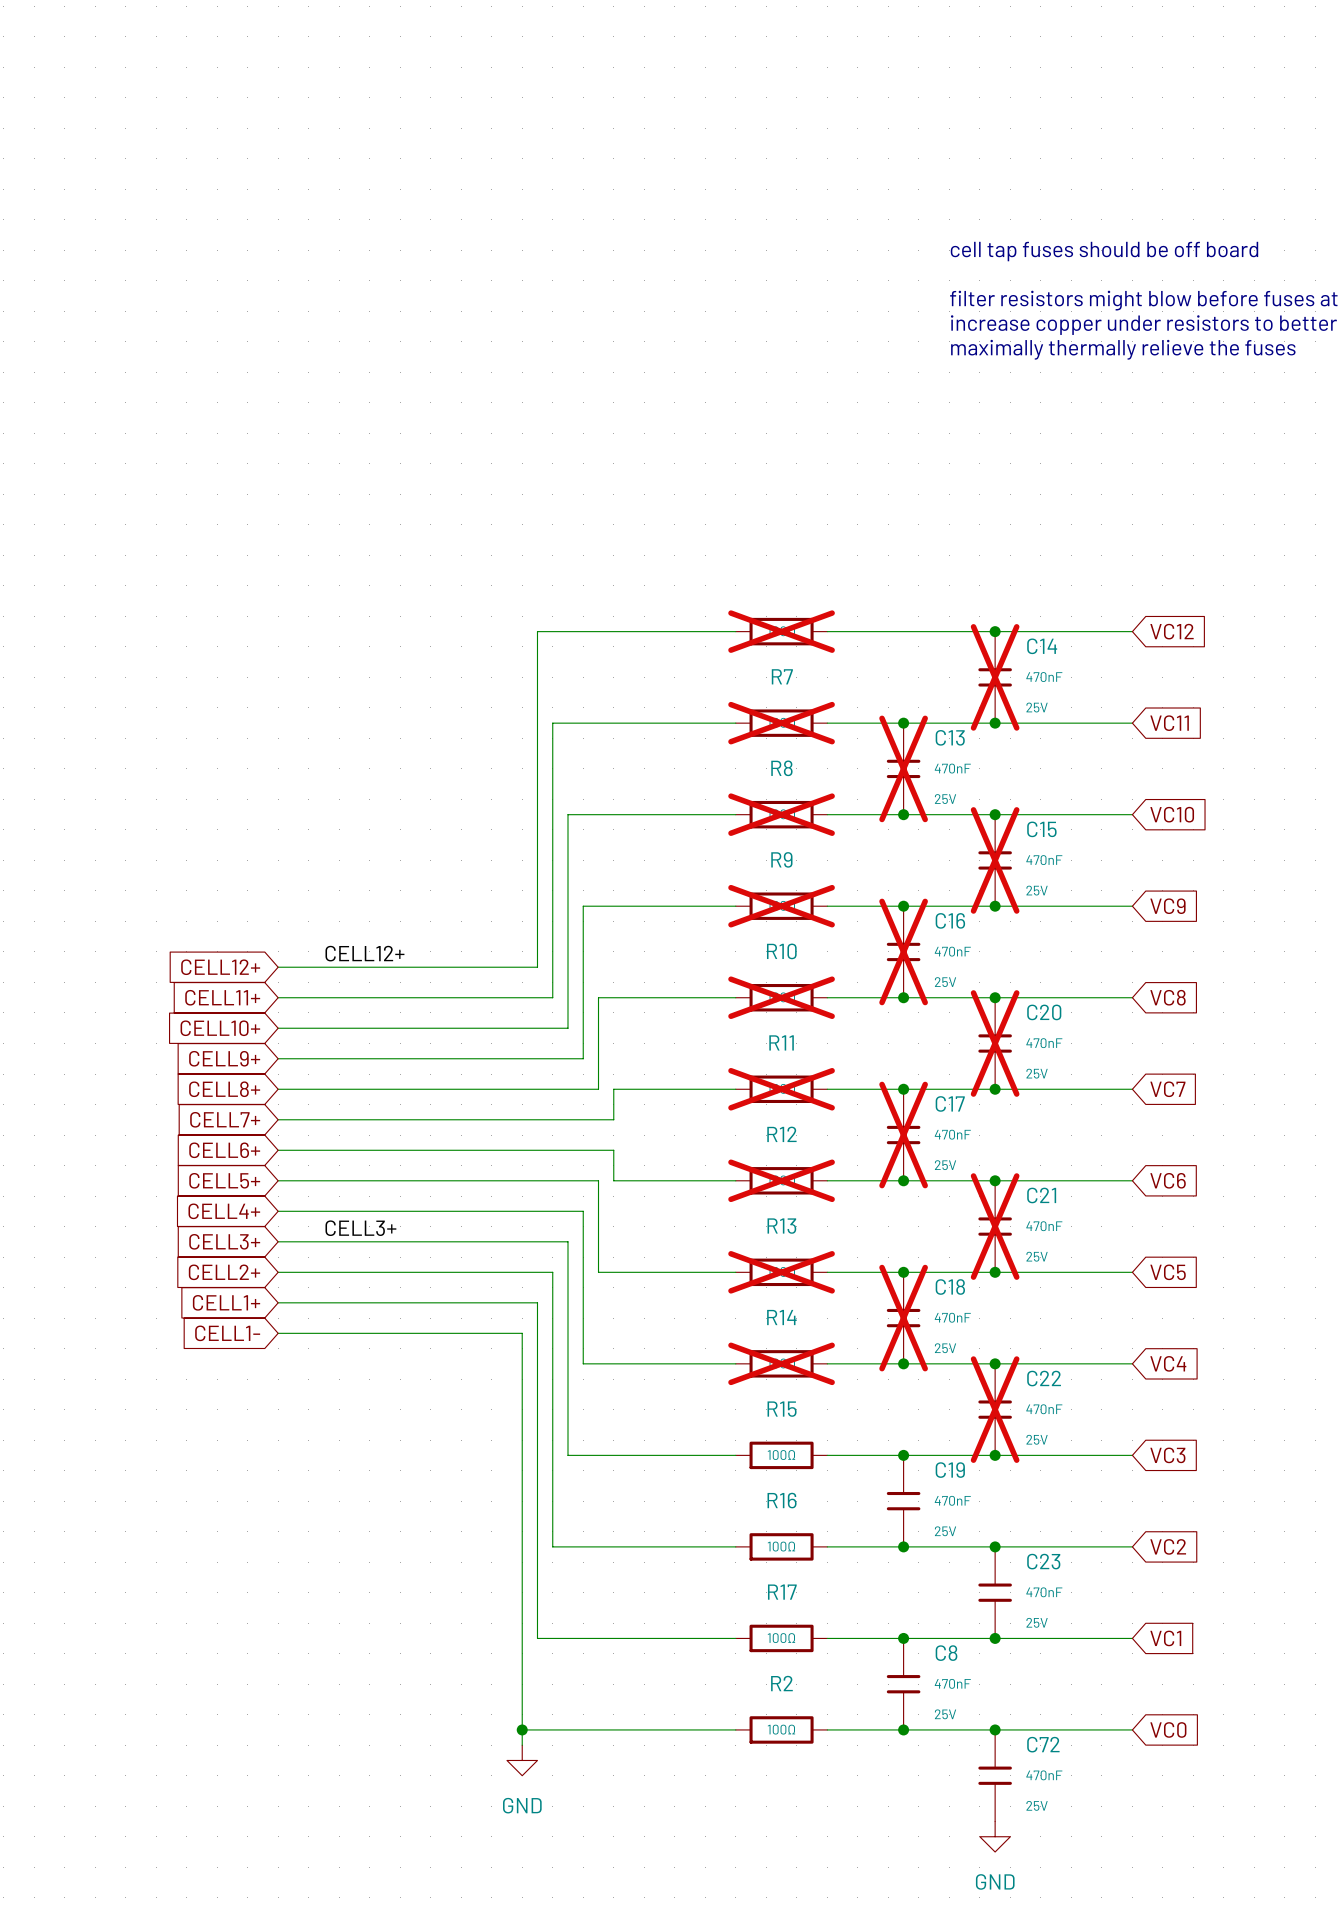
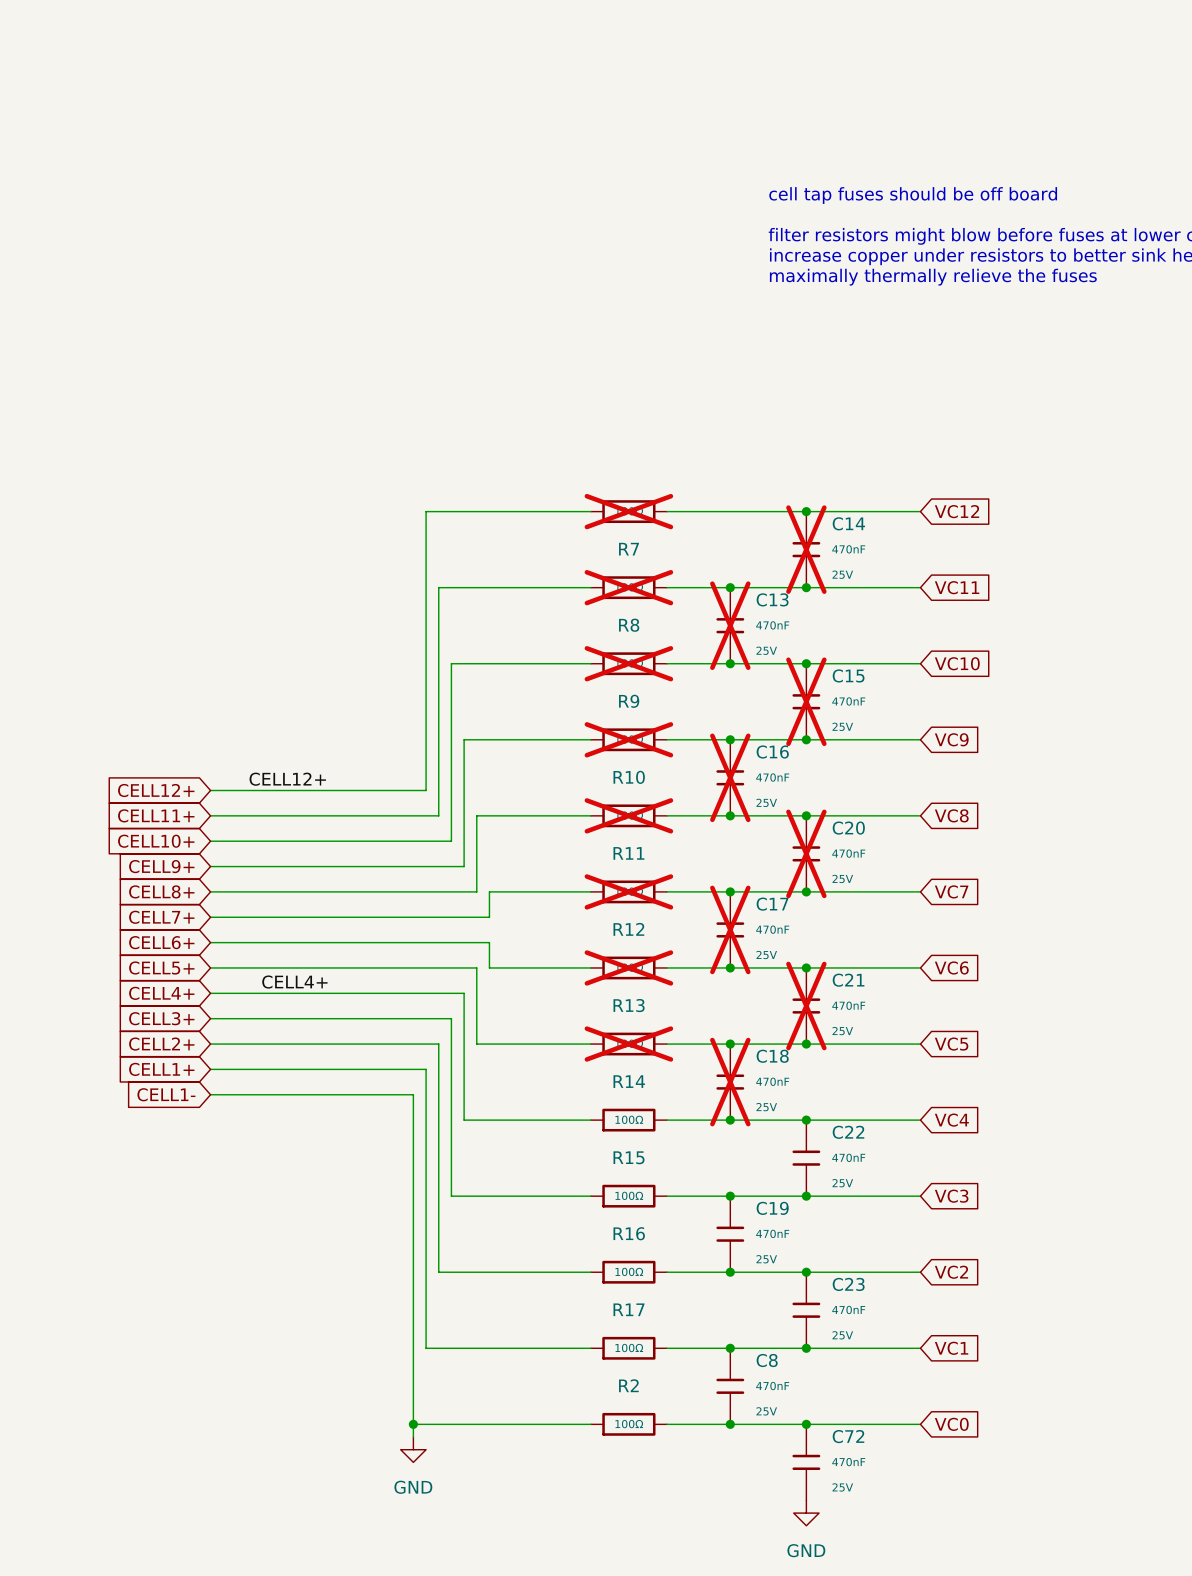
label: CELL3+ (360, 1228) -> CELL4+ (294, 982)
R14 do-not-place cross: (781, 1363) -> none
C22 do-not-place cross: (995, 1409) -> none

